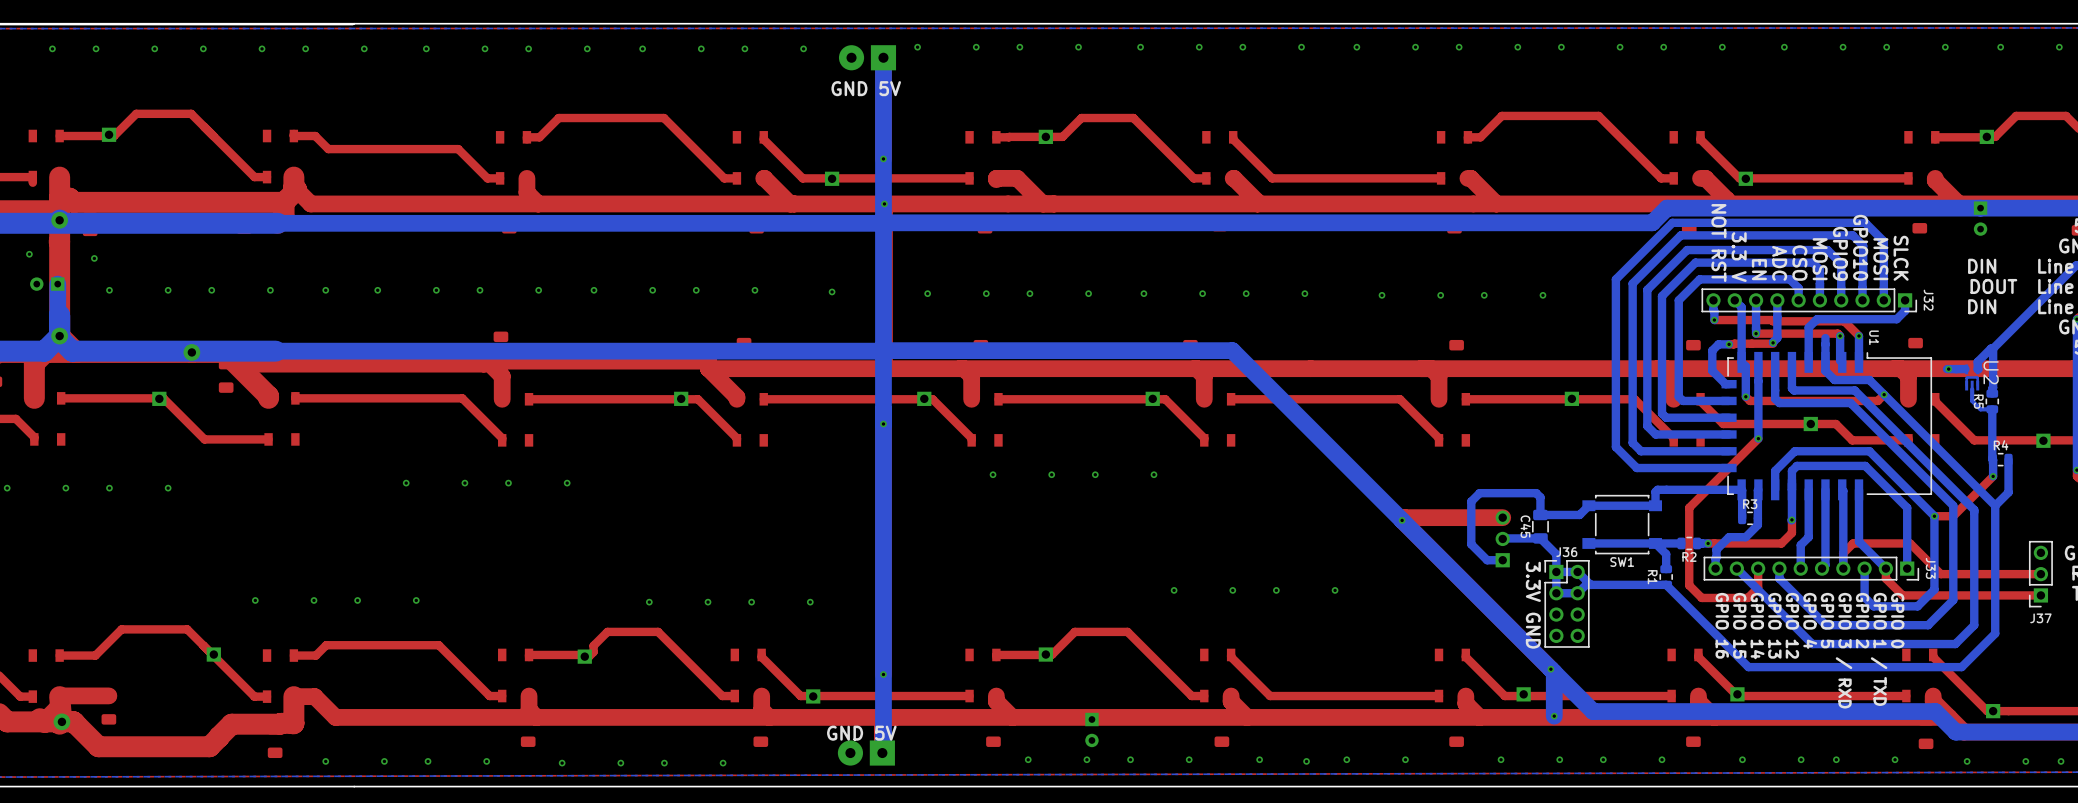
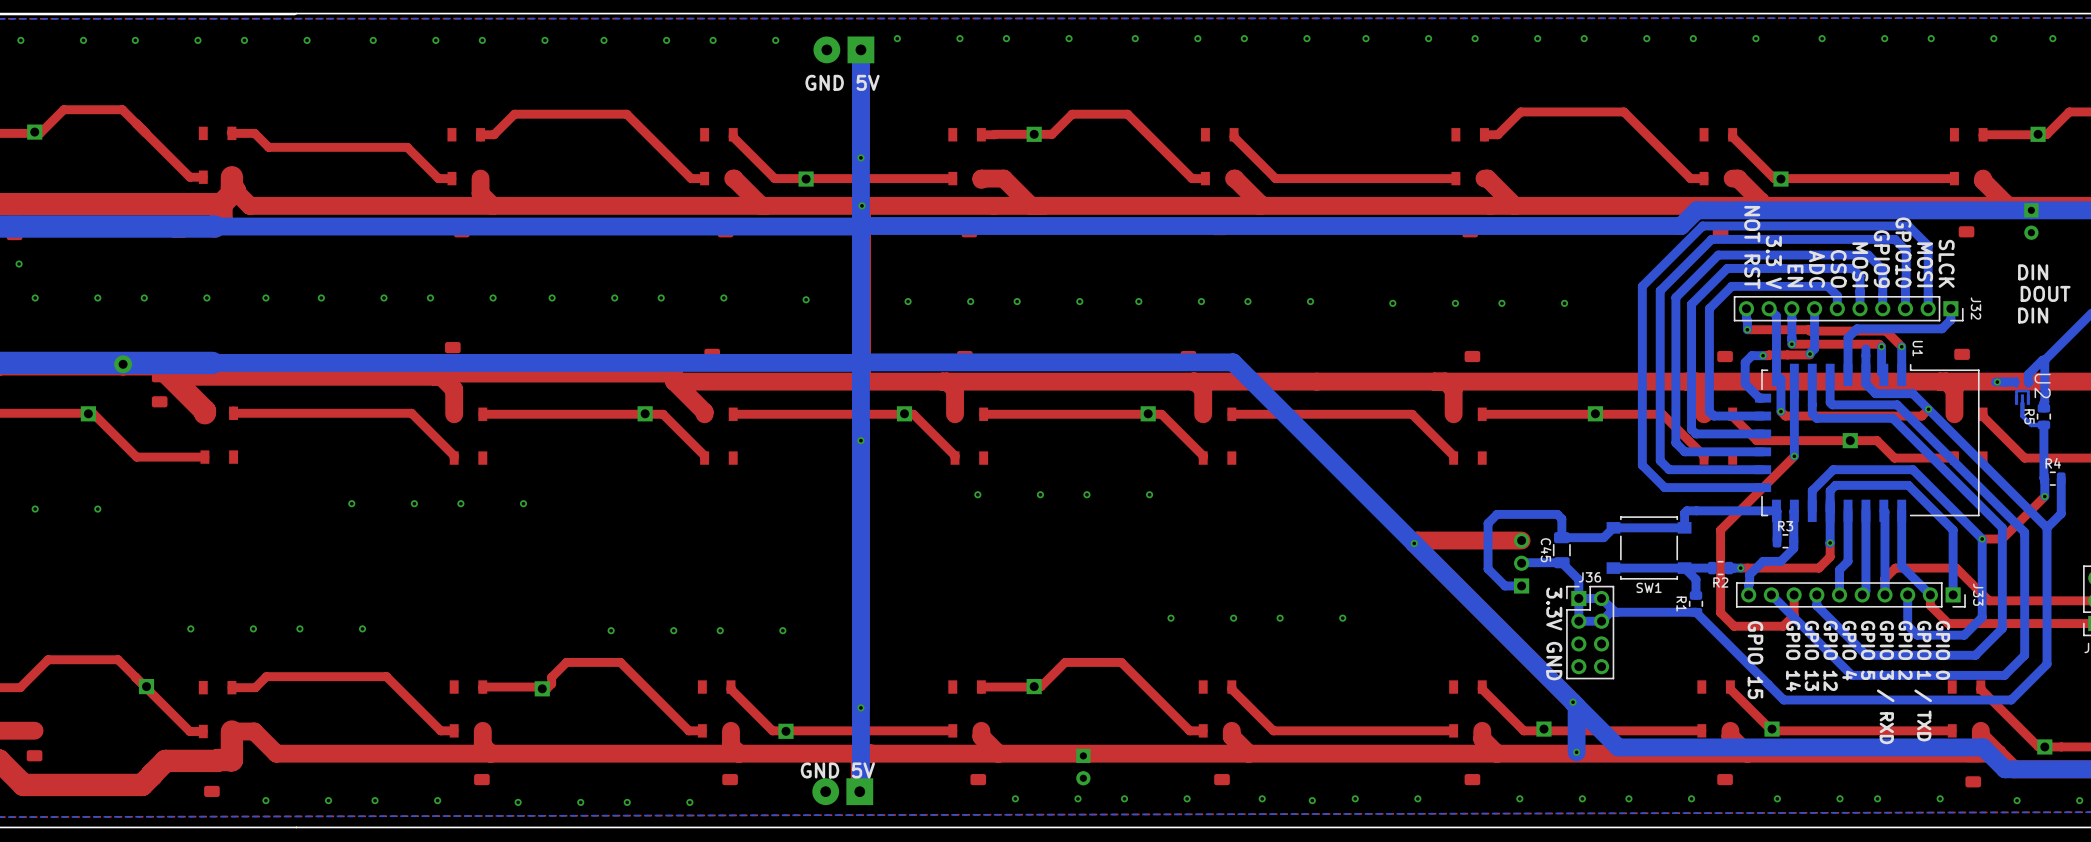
text: GPIO 16 (1722, 625) -> GPIO 15 (1755, 660)
text: GPIO 15 (1739, 625) -> none

